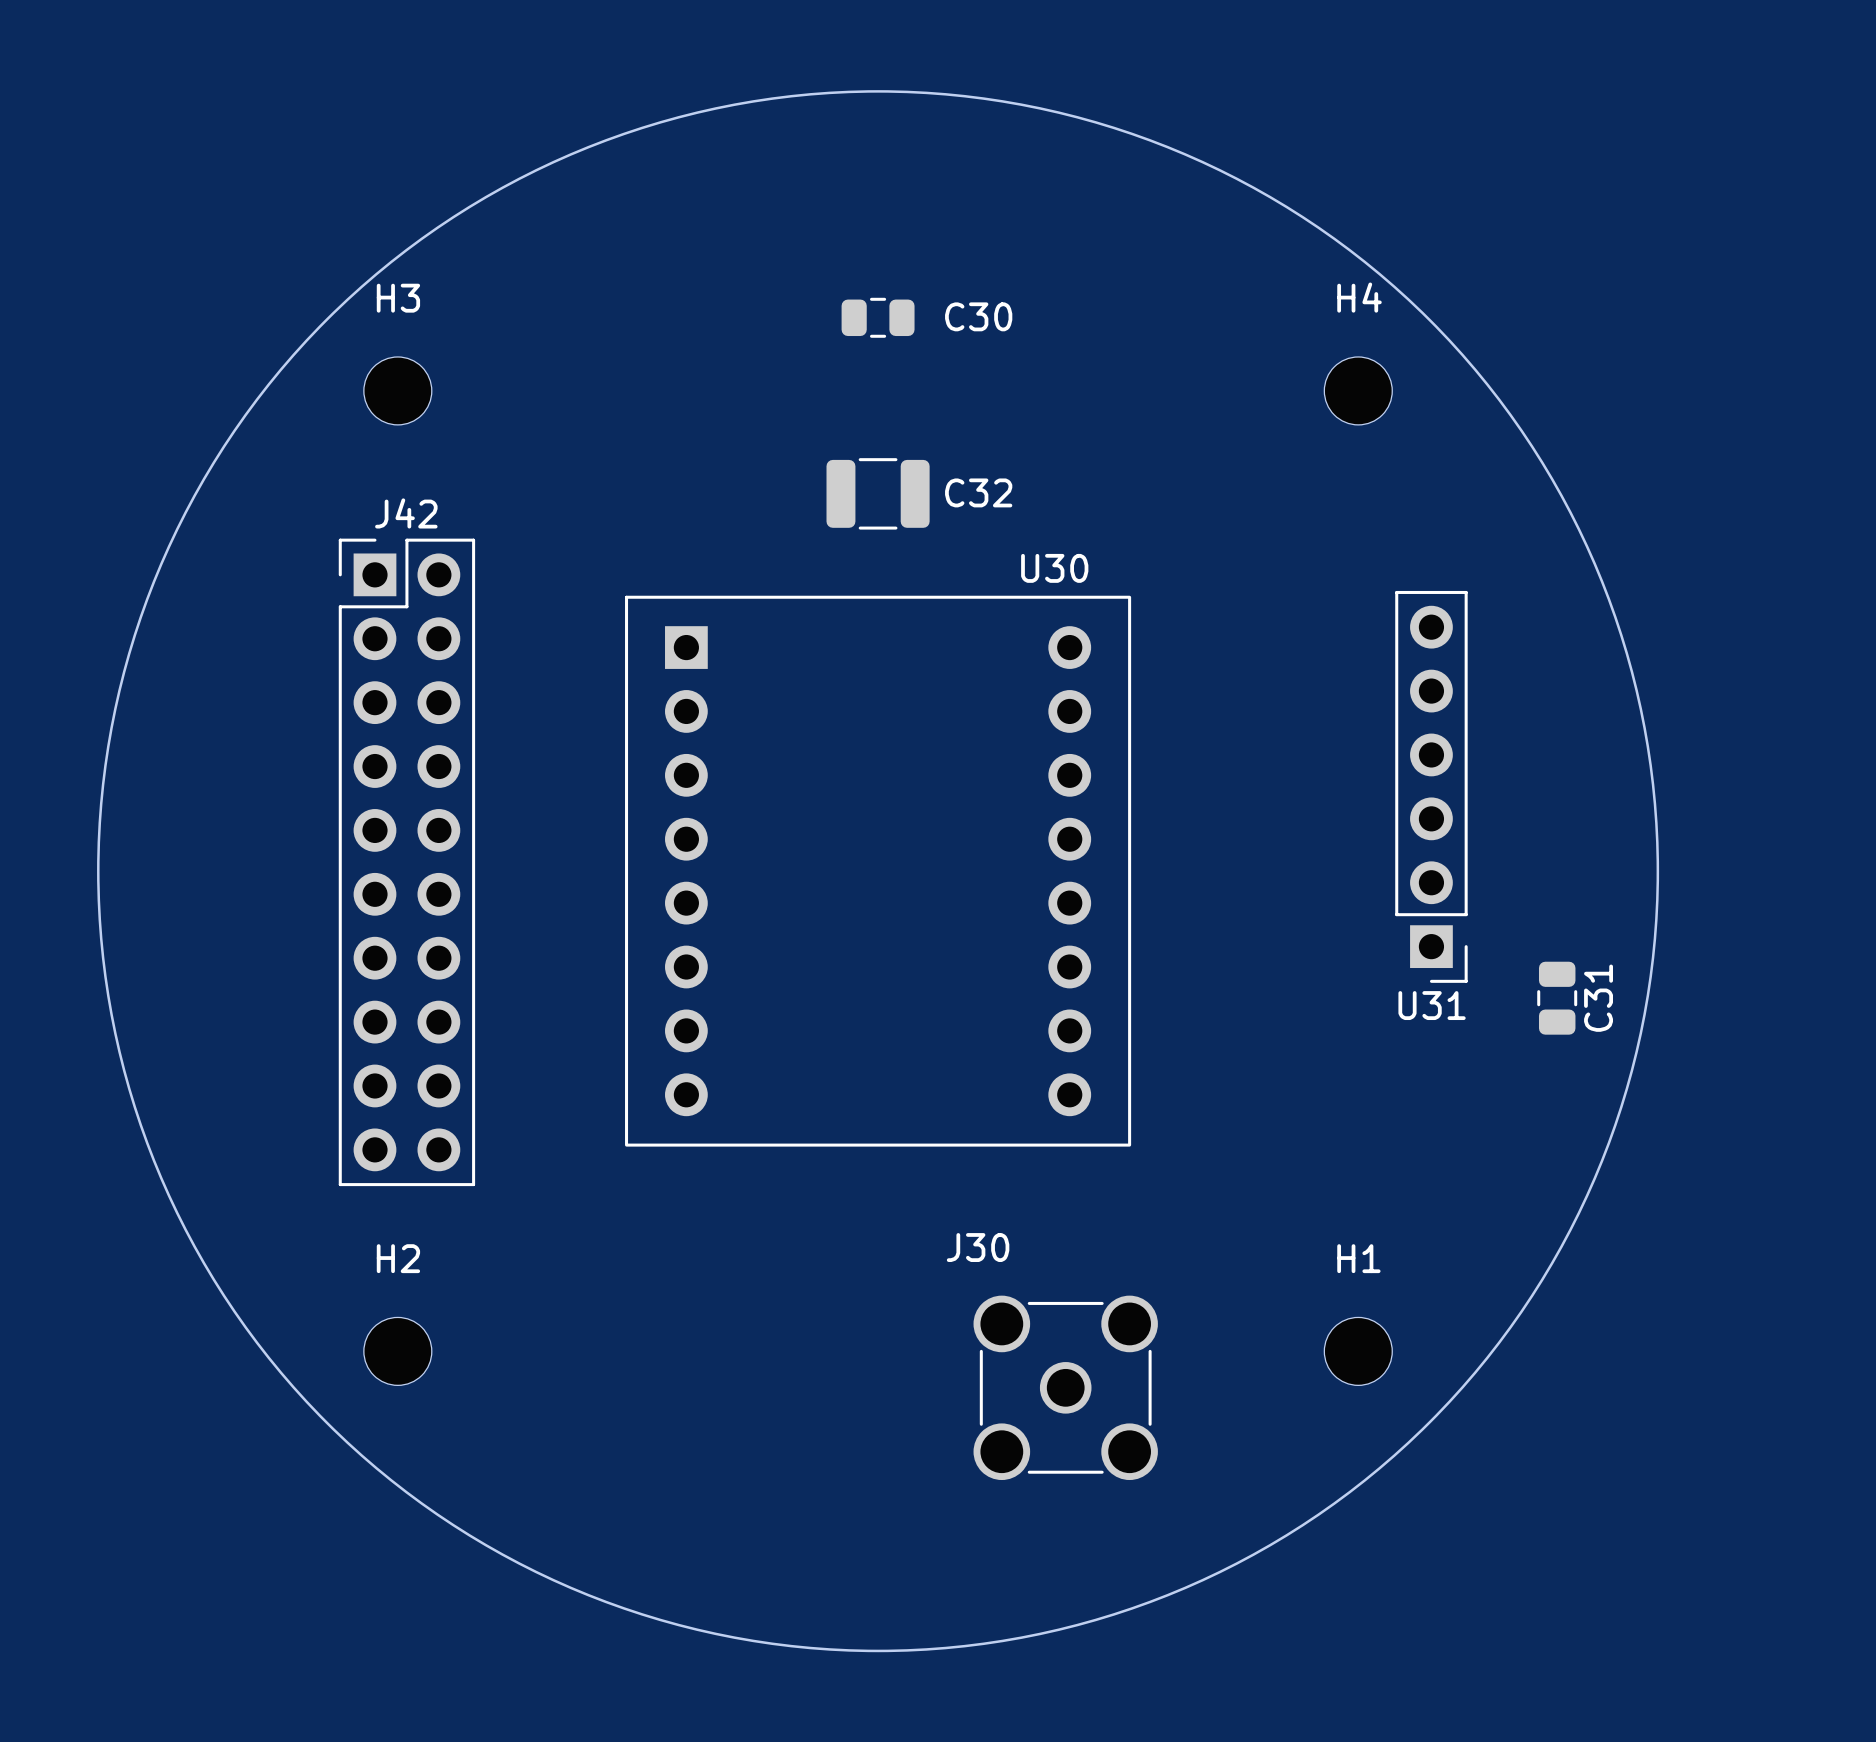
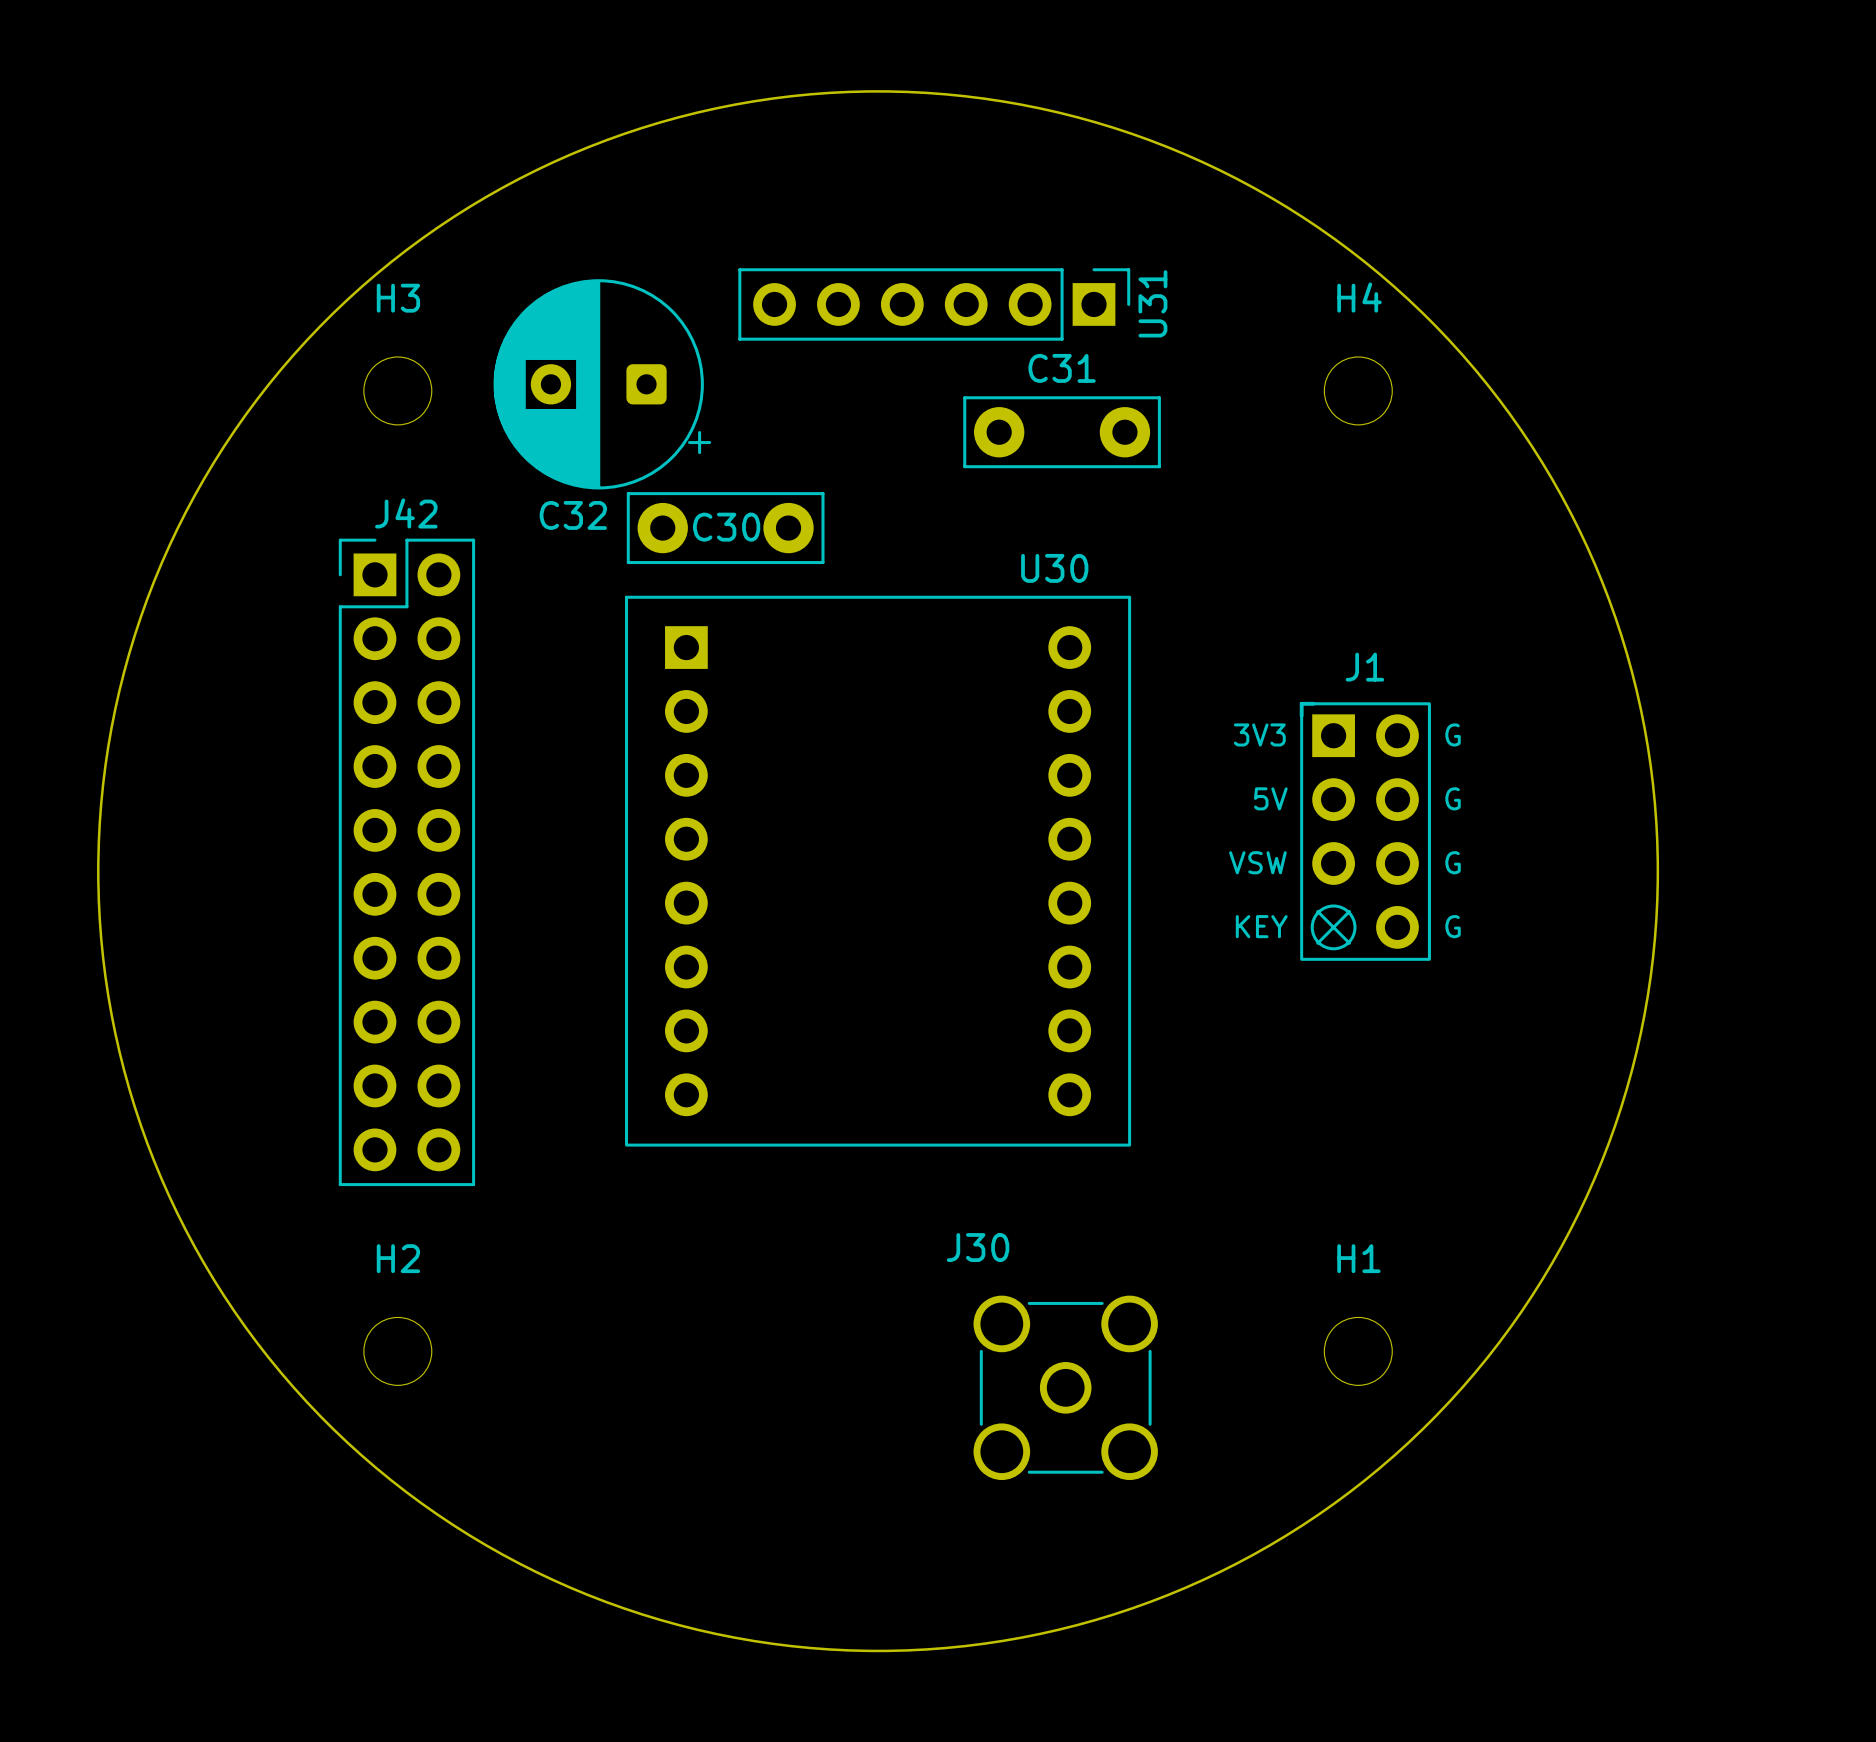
C30 footprint: [841, 297, 915, 338] -> [626, 492, 825, 565]
C30 name position: C30 (978, 316) -> C30 (726, 527)
C32 footprint: [826, 458, 930, 530] -> [493, 279, 712, 490]
C32 name position: C32 (978, 492) -> C32 (573, 515)
U31 rotation: 0° (1431, 786) -> 90° counterclockwise (934, 304)
U31 position: (1431, 786) -> (934, 304)
J1: none -> (1365, 831)
C31 footprint: [1537, 961, 1578, 1035] -> [963, 396, 1161, 469]
C31 name position: C31 (1598, 998) -> C31 (1062, 368)

